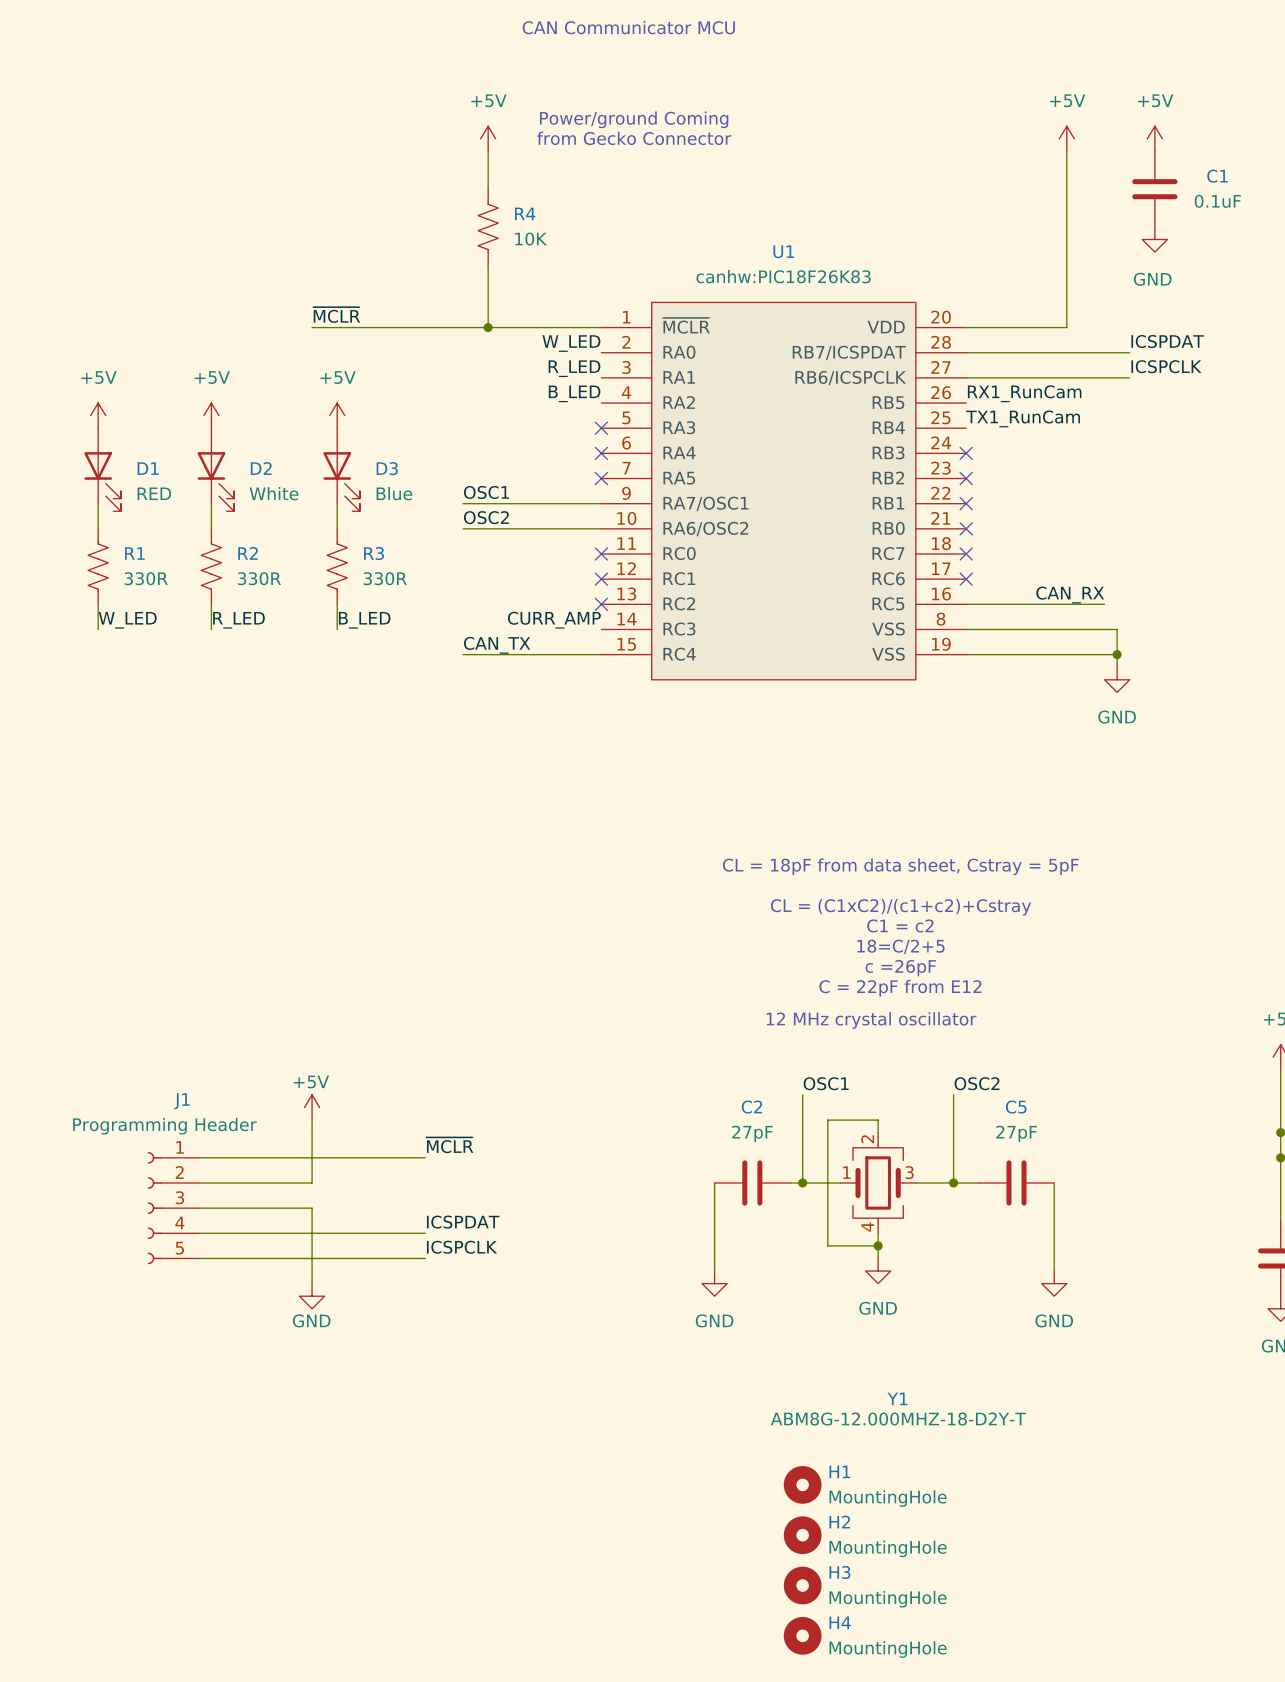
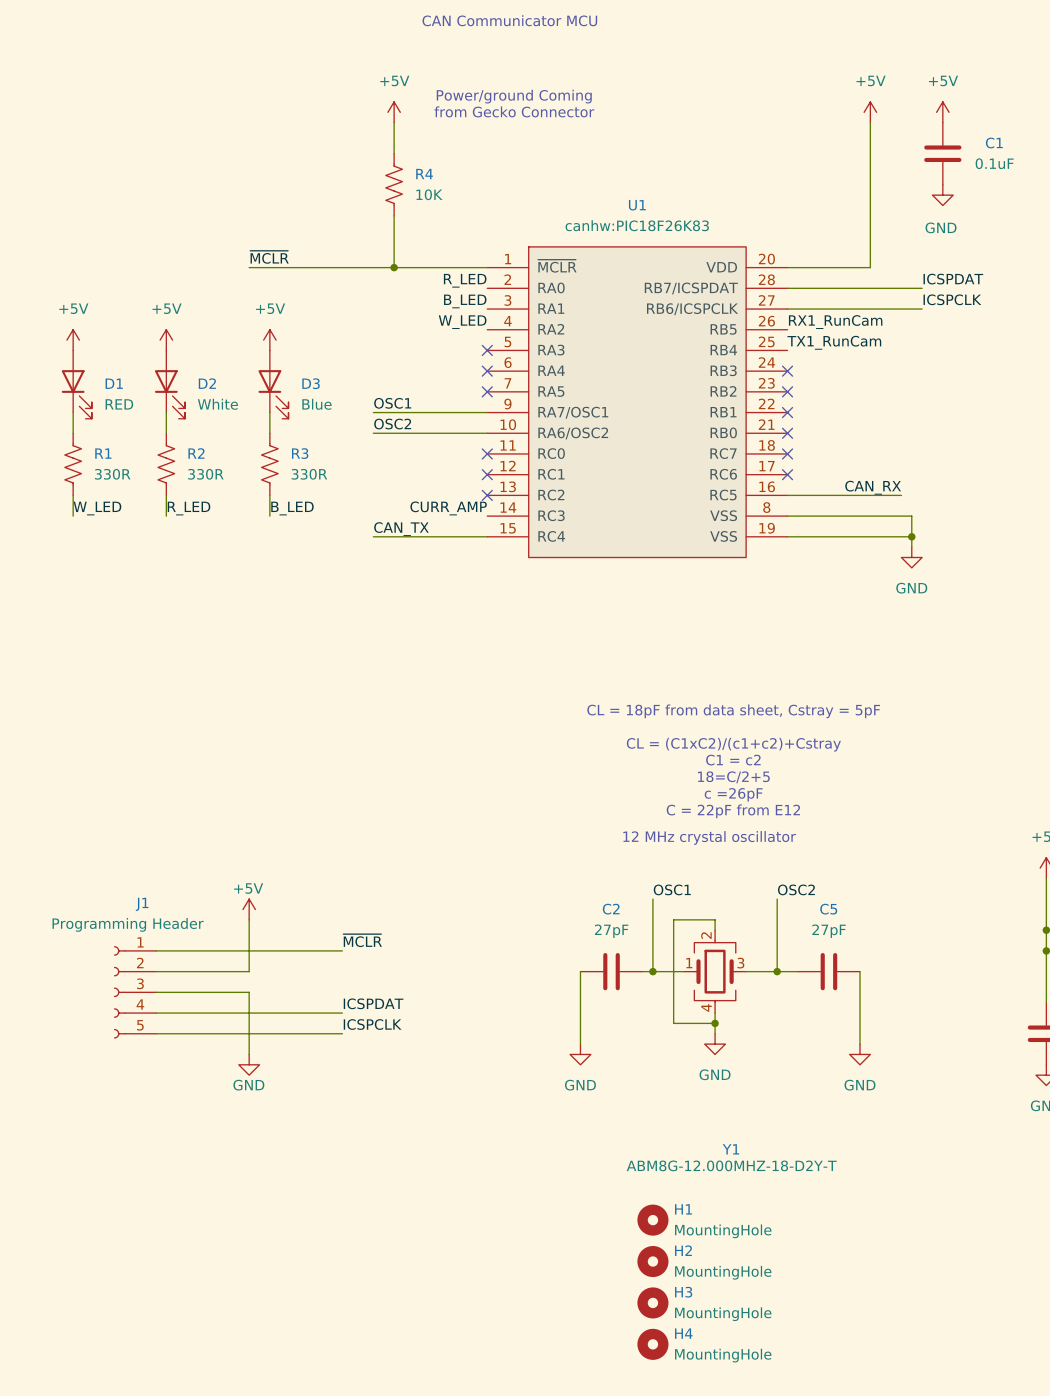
label: W_LED (571, 343) -> R_LED (465, 280)
label: R_LED (574, 368) -> B_LED (465, 301)
label: B_LED (574, 393) -> W_LED (462, 322)

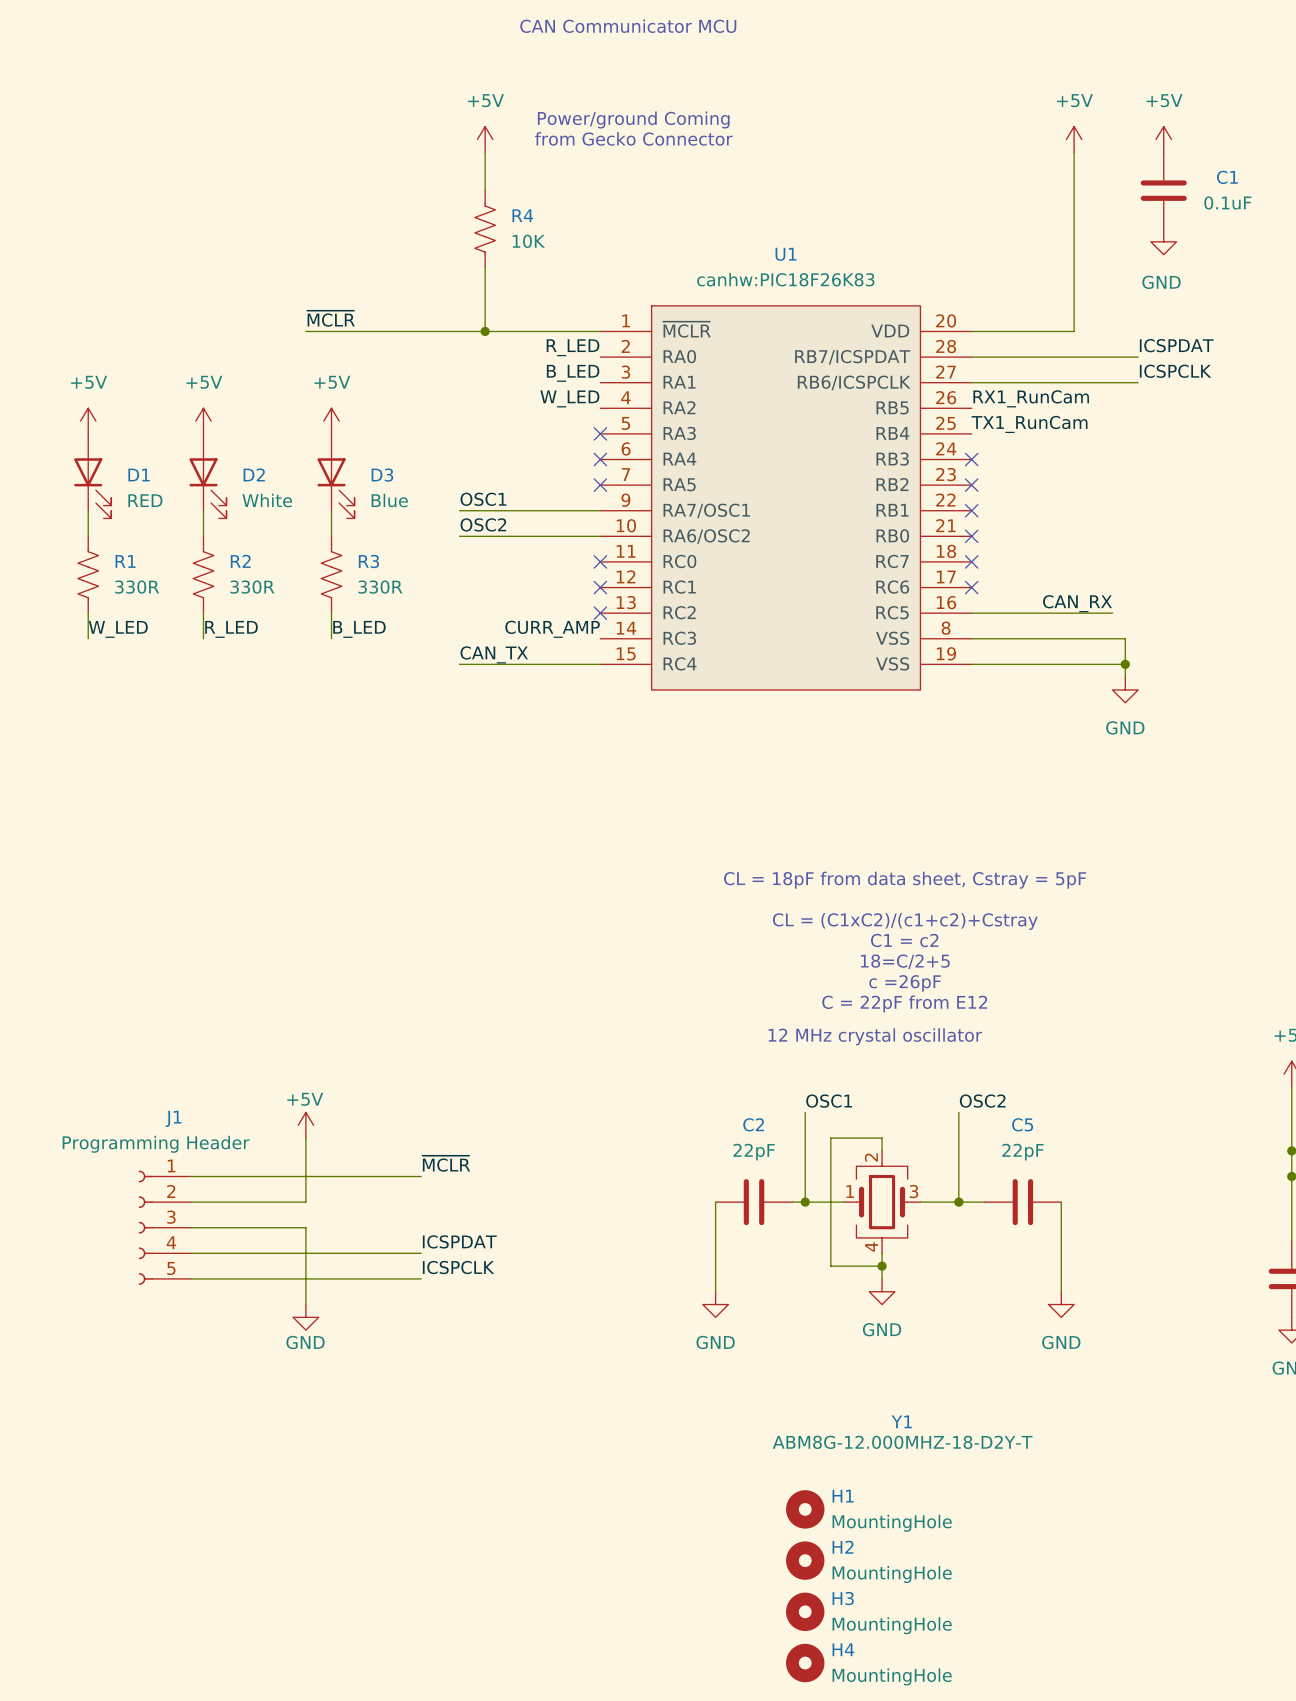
C2 value: 27pF (611, 931) -> 22pF (754, 1152)
C5 value: 27pF (829, 931) -> 22pF (1023, 1152)

